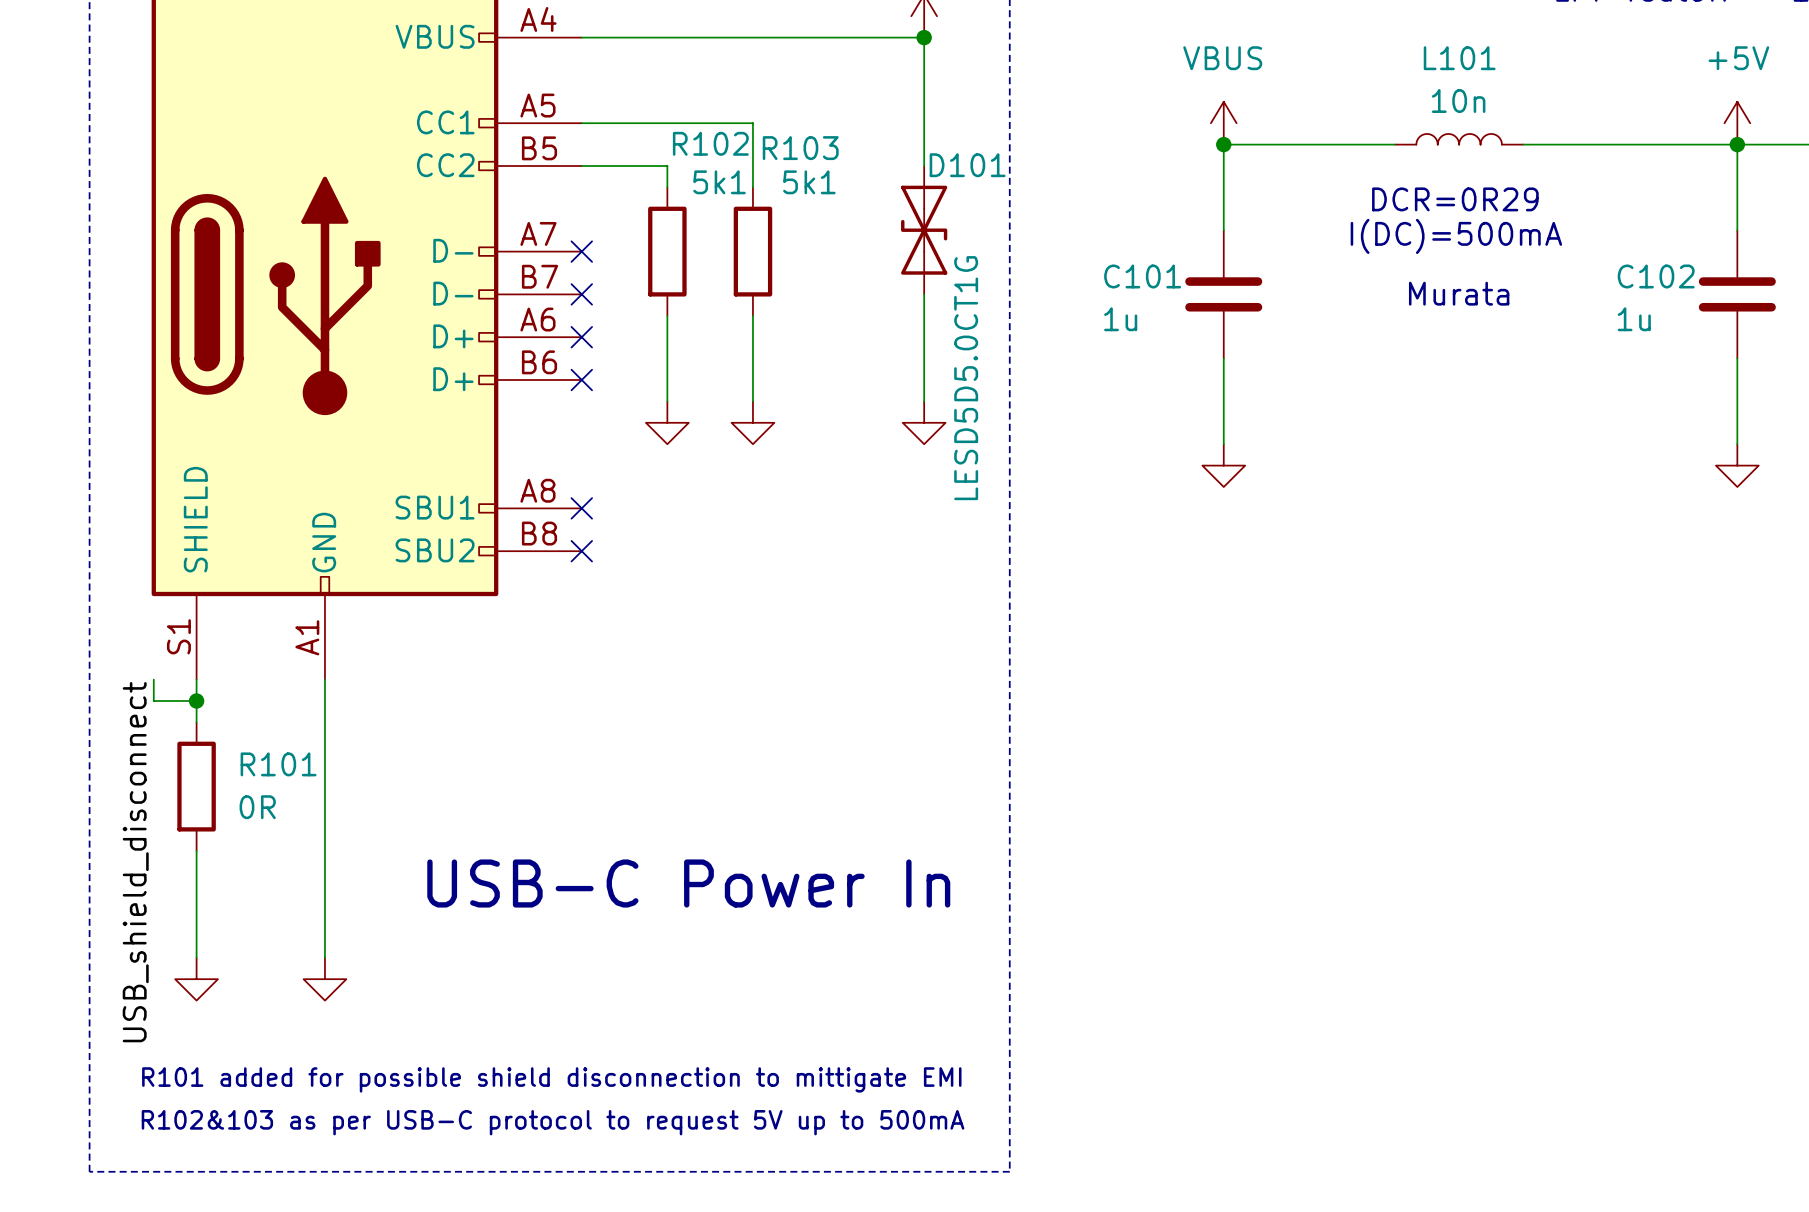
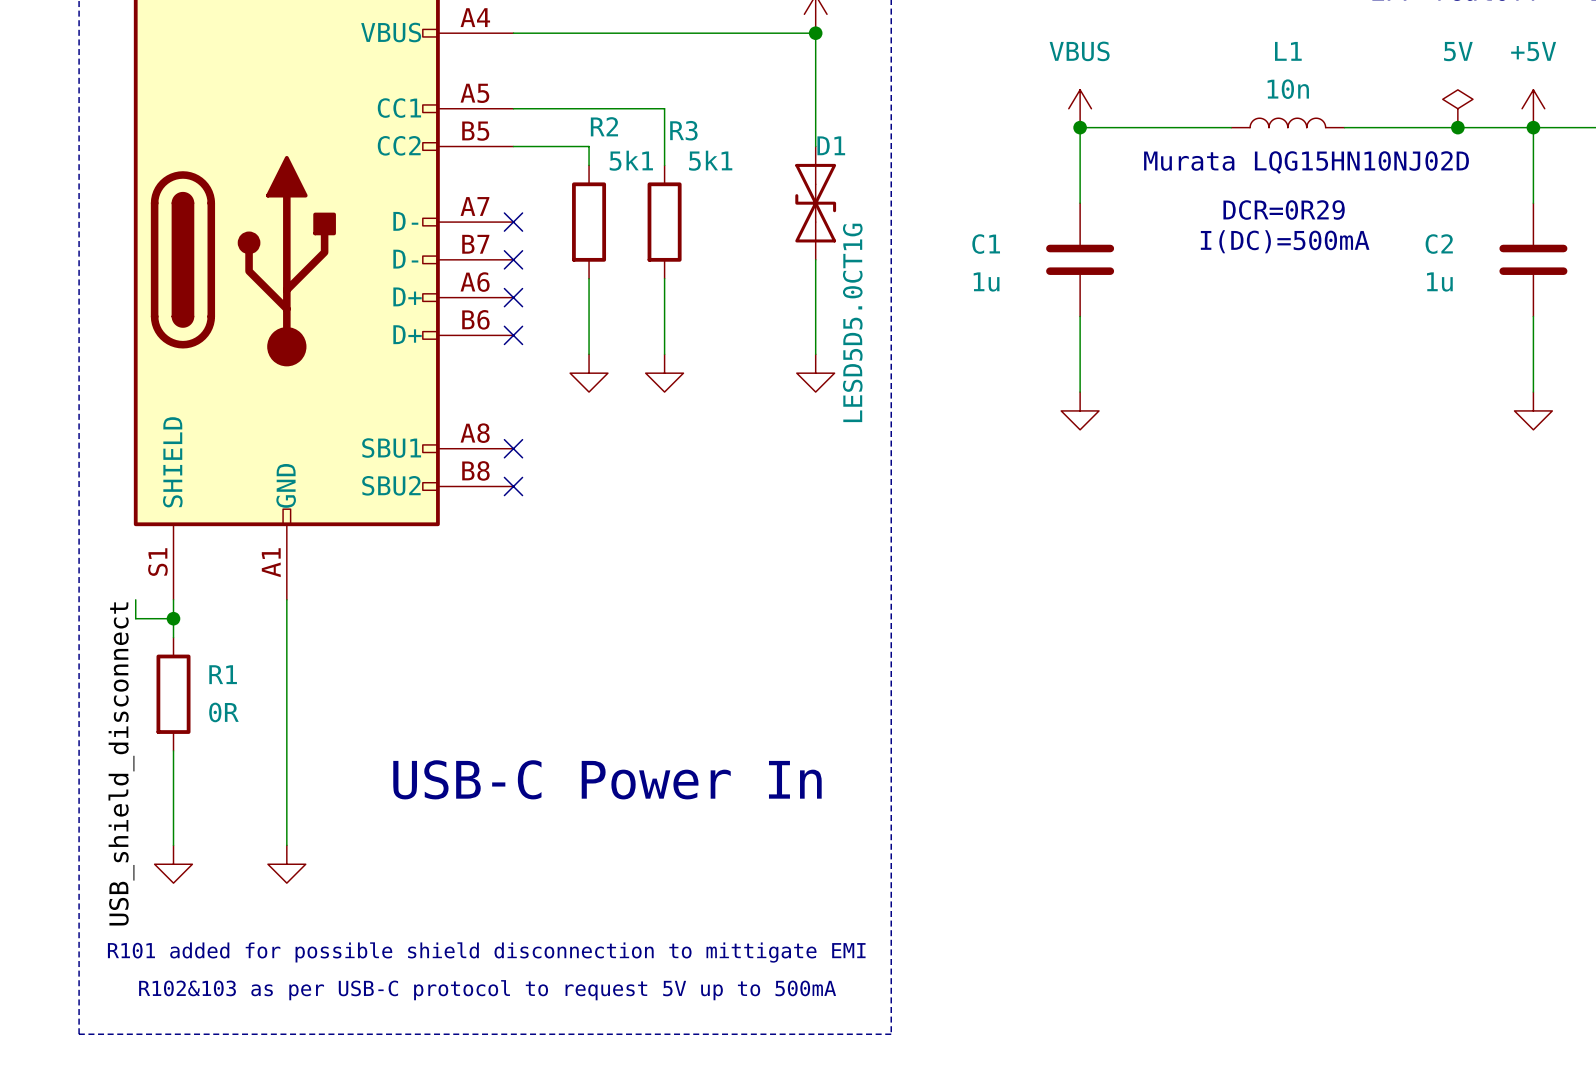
L101 name: L101 (1459, 58) -> L1 (1288, 51)
power symbol: none -> 5V (1457, 108)
R102 name: R102 (710, 143) -> R2 (604, 126)
junction: none -> (1457, 127)
R103 name: R103 (800, 148) -> R3 (683, 130)
D101 name: D101 (967, 165) -> D1 (831, 145)
text: none -> Murata LQG15HN10NJ02D (1306, 162)
text position: DCR=0R29 (1455, 199) -> DCR=0R29 (1284, 210)
text position: I(DC)=500mA (1456, 236) -> I(DC)=500mA (1285, 241)
C101 name: C101 (1142, 276) -> C1 (986, 244)
C102 name: C102 (1656, 276) -> C2 (1439, 244)
text: Murata (1459, 293) -> none
R101 name: R101 (278, 764) -> R1 (223, 674)

